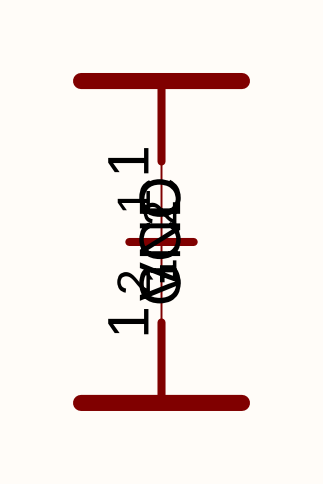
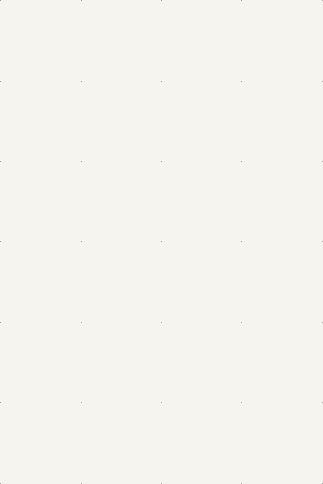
power symbol: (161, 119) -> none
part: (161, 241) -> none
power symbol: (161, 364) -> none

